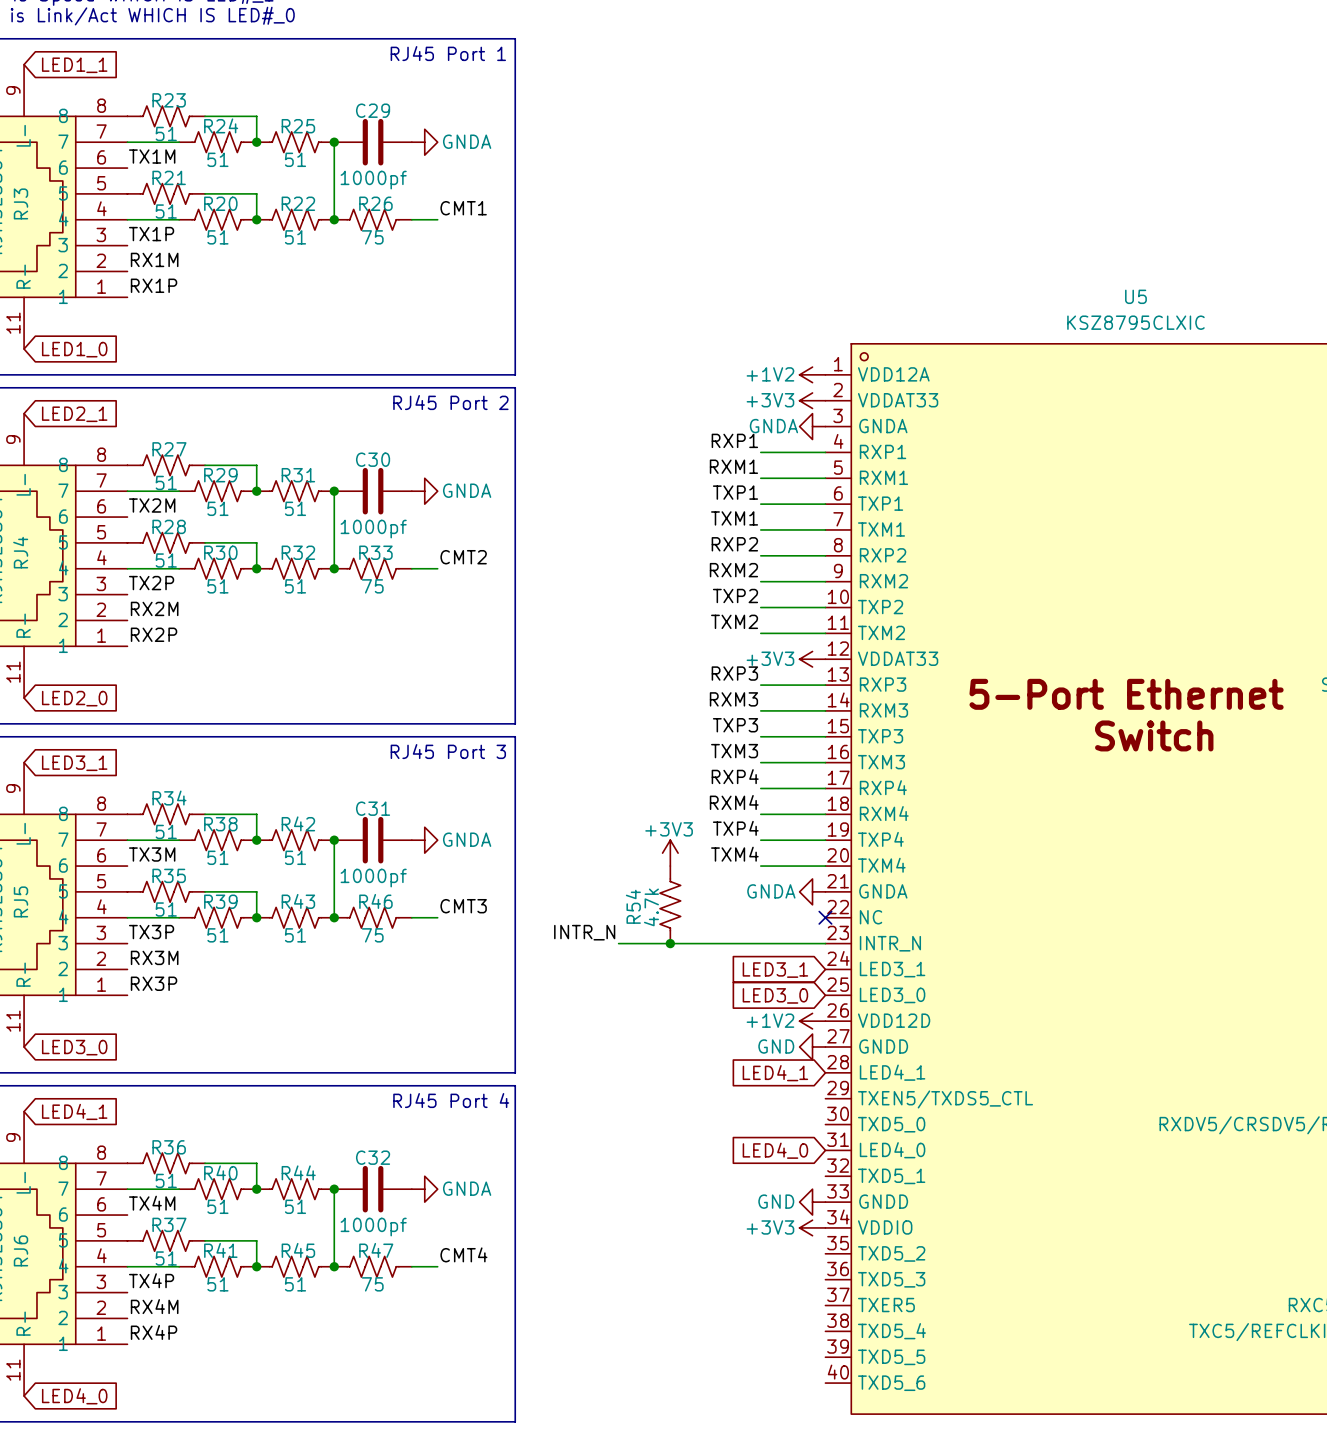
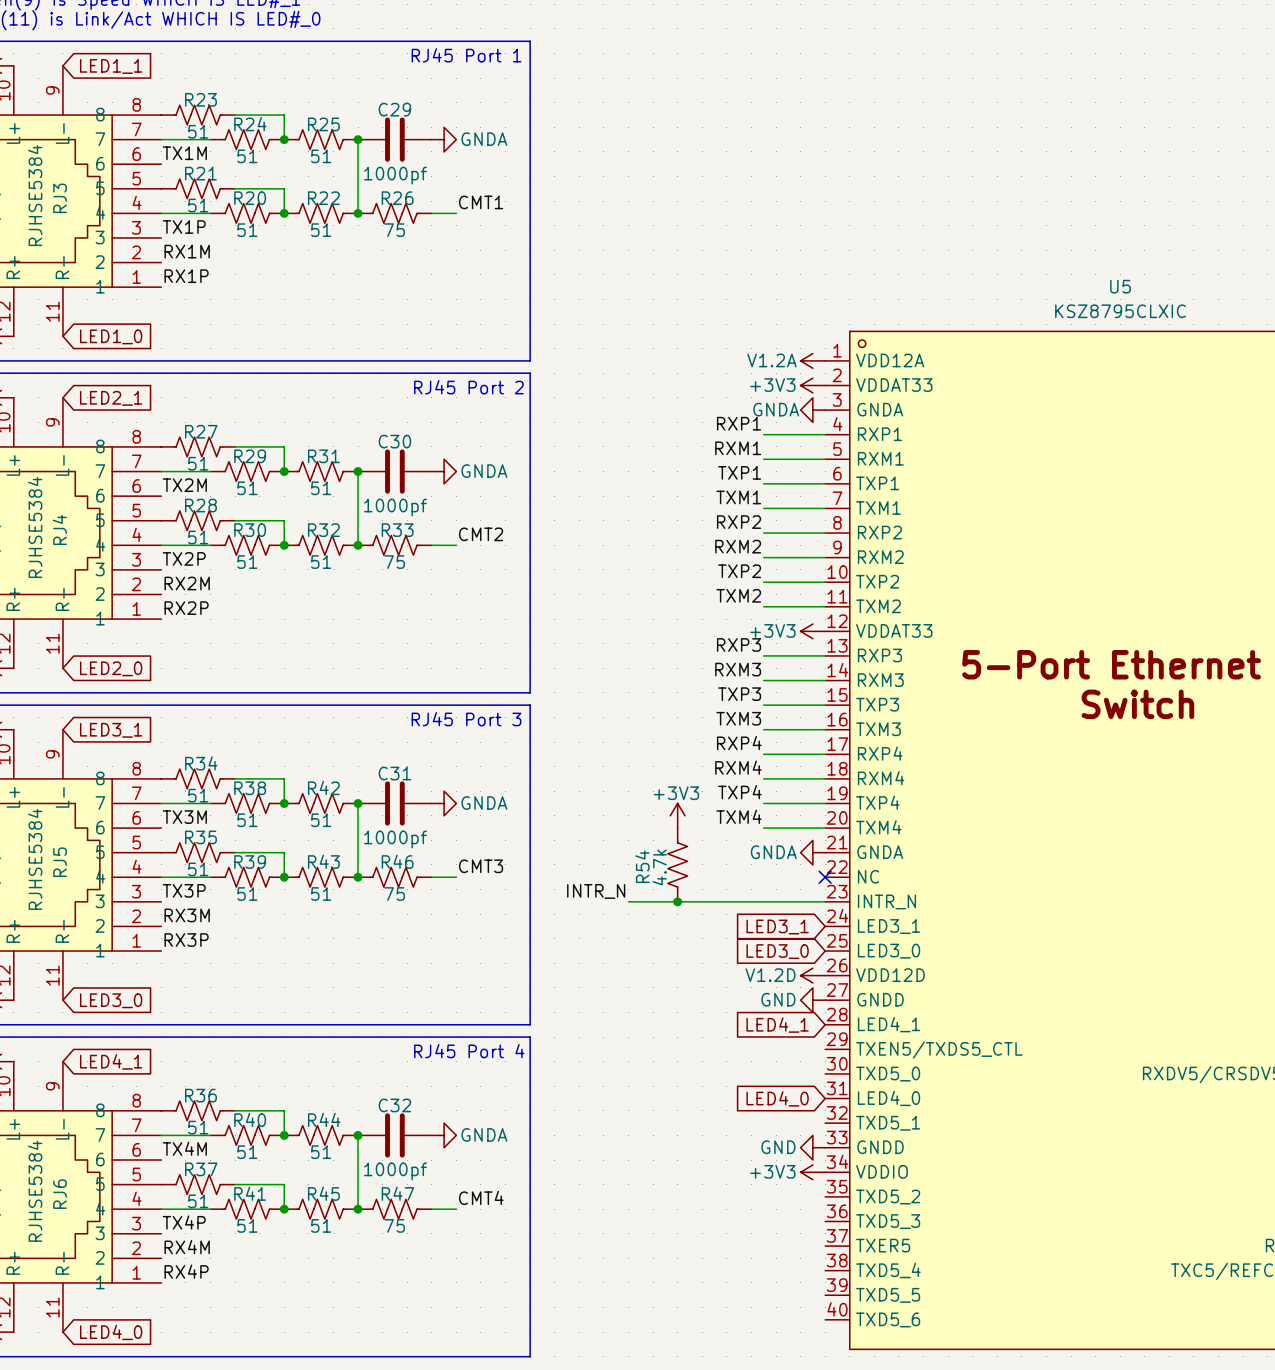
power symbol: +1V2 (812, 374) -> V1.2A (812, 360)
power symbol: +1V2 (812, 1021) -> V1.2D (812, 975)

